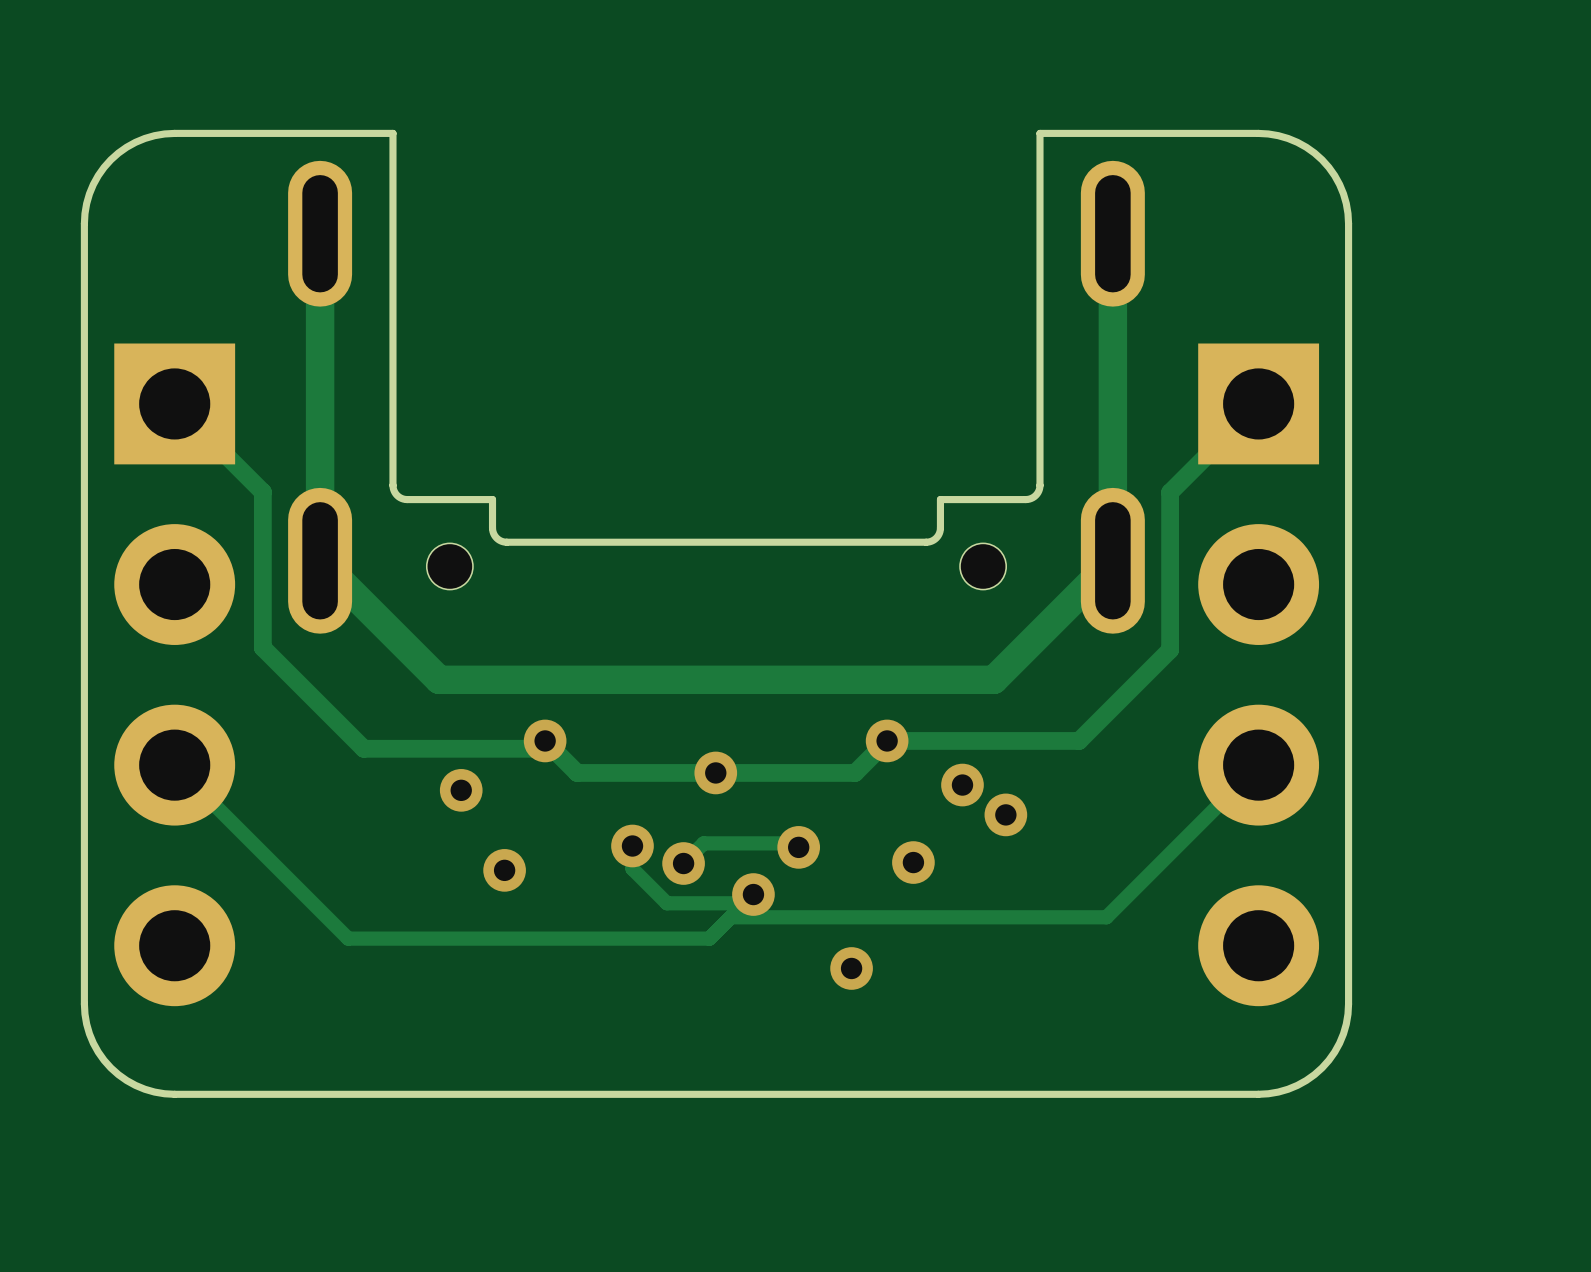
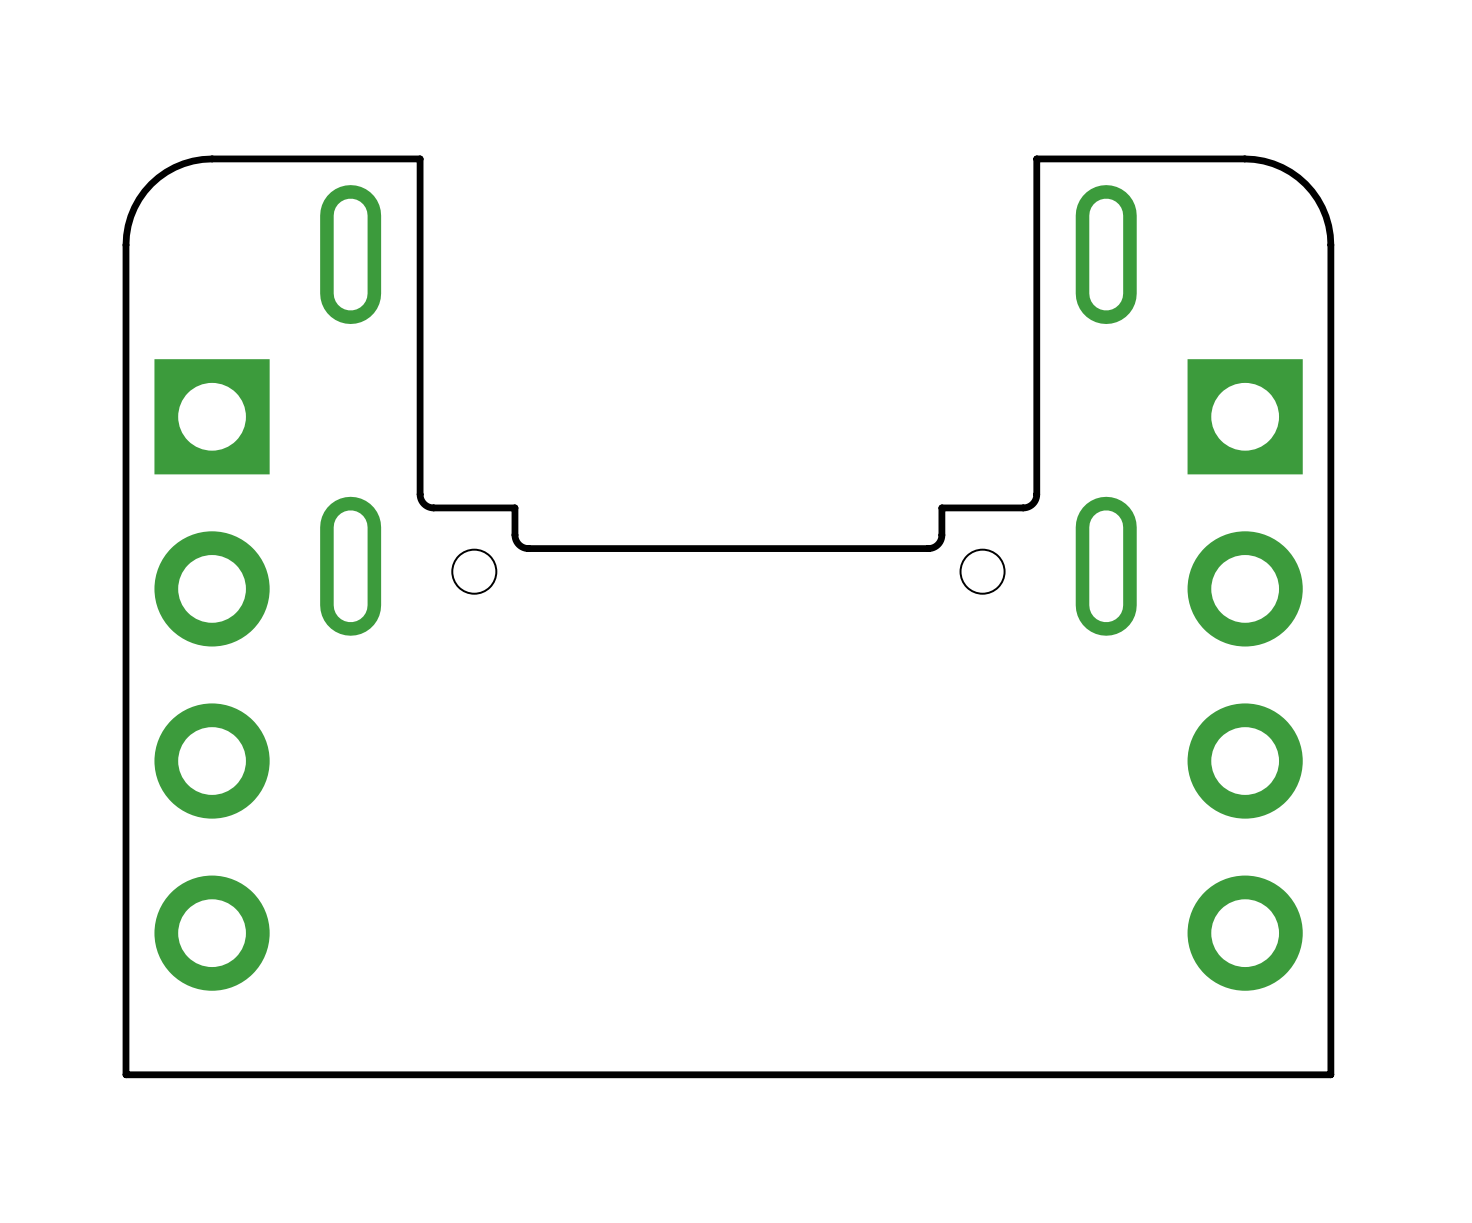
track: (1112, 233) (1112, 560) (993, 679) (439, 679) (320, 560) (320, 233) -> none
track: (174, 403) (262, 492) (262, 647) (363, 748) (538, 748) (545, 741) -> none
track: (1258, 403) (1170, 492) (1170, 649) (1079, 740) (887, 740) (855, 772) (577, 772) (545, 740) -> none
via: (545, 740) -> none
via: (887, 740) -> none
track: (174, 765) (348, 938) (709, 938) (753, 894) -> none
track: (1258, 765) (1106, 917) (730, 917) -> none
via: (715, 772) -> none
via: (962, 785) -> none
via: (461, 790) -> none
via: (1005, 814) -> none
track: (632, 846) (632, 868) (666, 903) (744, 903) -> none
via: (632, 846) -> none
track: (798, 847) (794, 843) (703, 843) (683, 863) -> none
via: (798, 847) -> none
via: (913, 862) -> none
via: (683, 863) -> none
via: (504, 870) -> none
via: (753, 894) -> none
via: (851, 968) -> none
board edge: (84, 1004) (86, 1024) (93, 1043) (110, 1067) (126, 1080) (144, 1089) (174, 1094) -> (125, 988) (125, 1074) (212, 1074)
board edge: (1348, 1004) (1343, 1033) (1334, 1052) (1322, 1067) (1306, 1080) (1288, 1089) (1258, 1094) -> (1330, 988) (1330, 1074) (1244, 1074)

